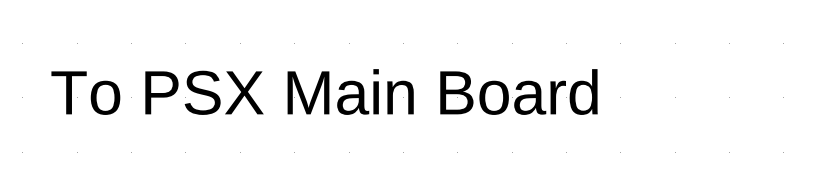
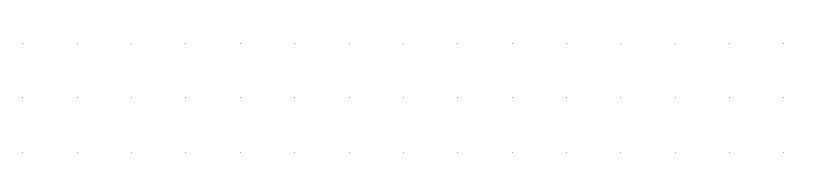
text: To PSX Main Board (324, 92) -> none

